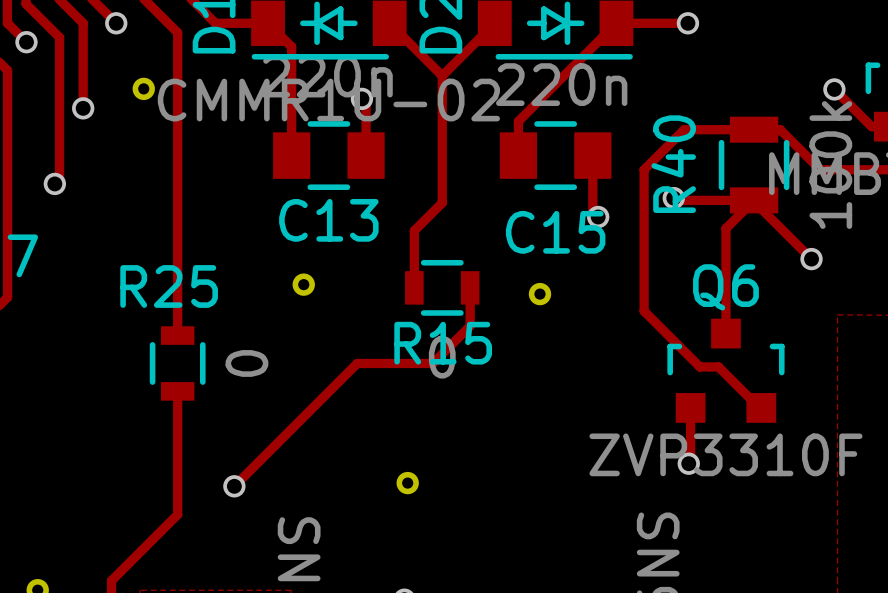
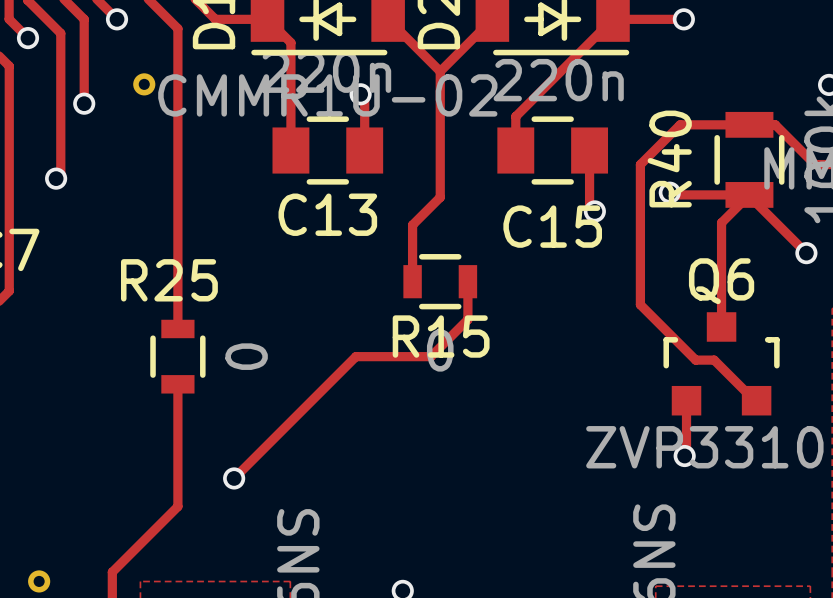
part: (303, 284) -> none
part: (539, 294) -> none
part: (407, 483) -> none

